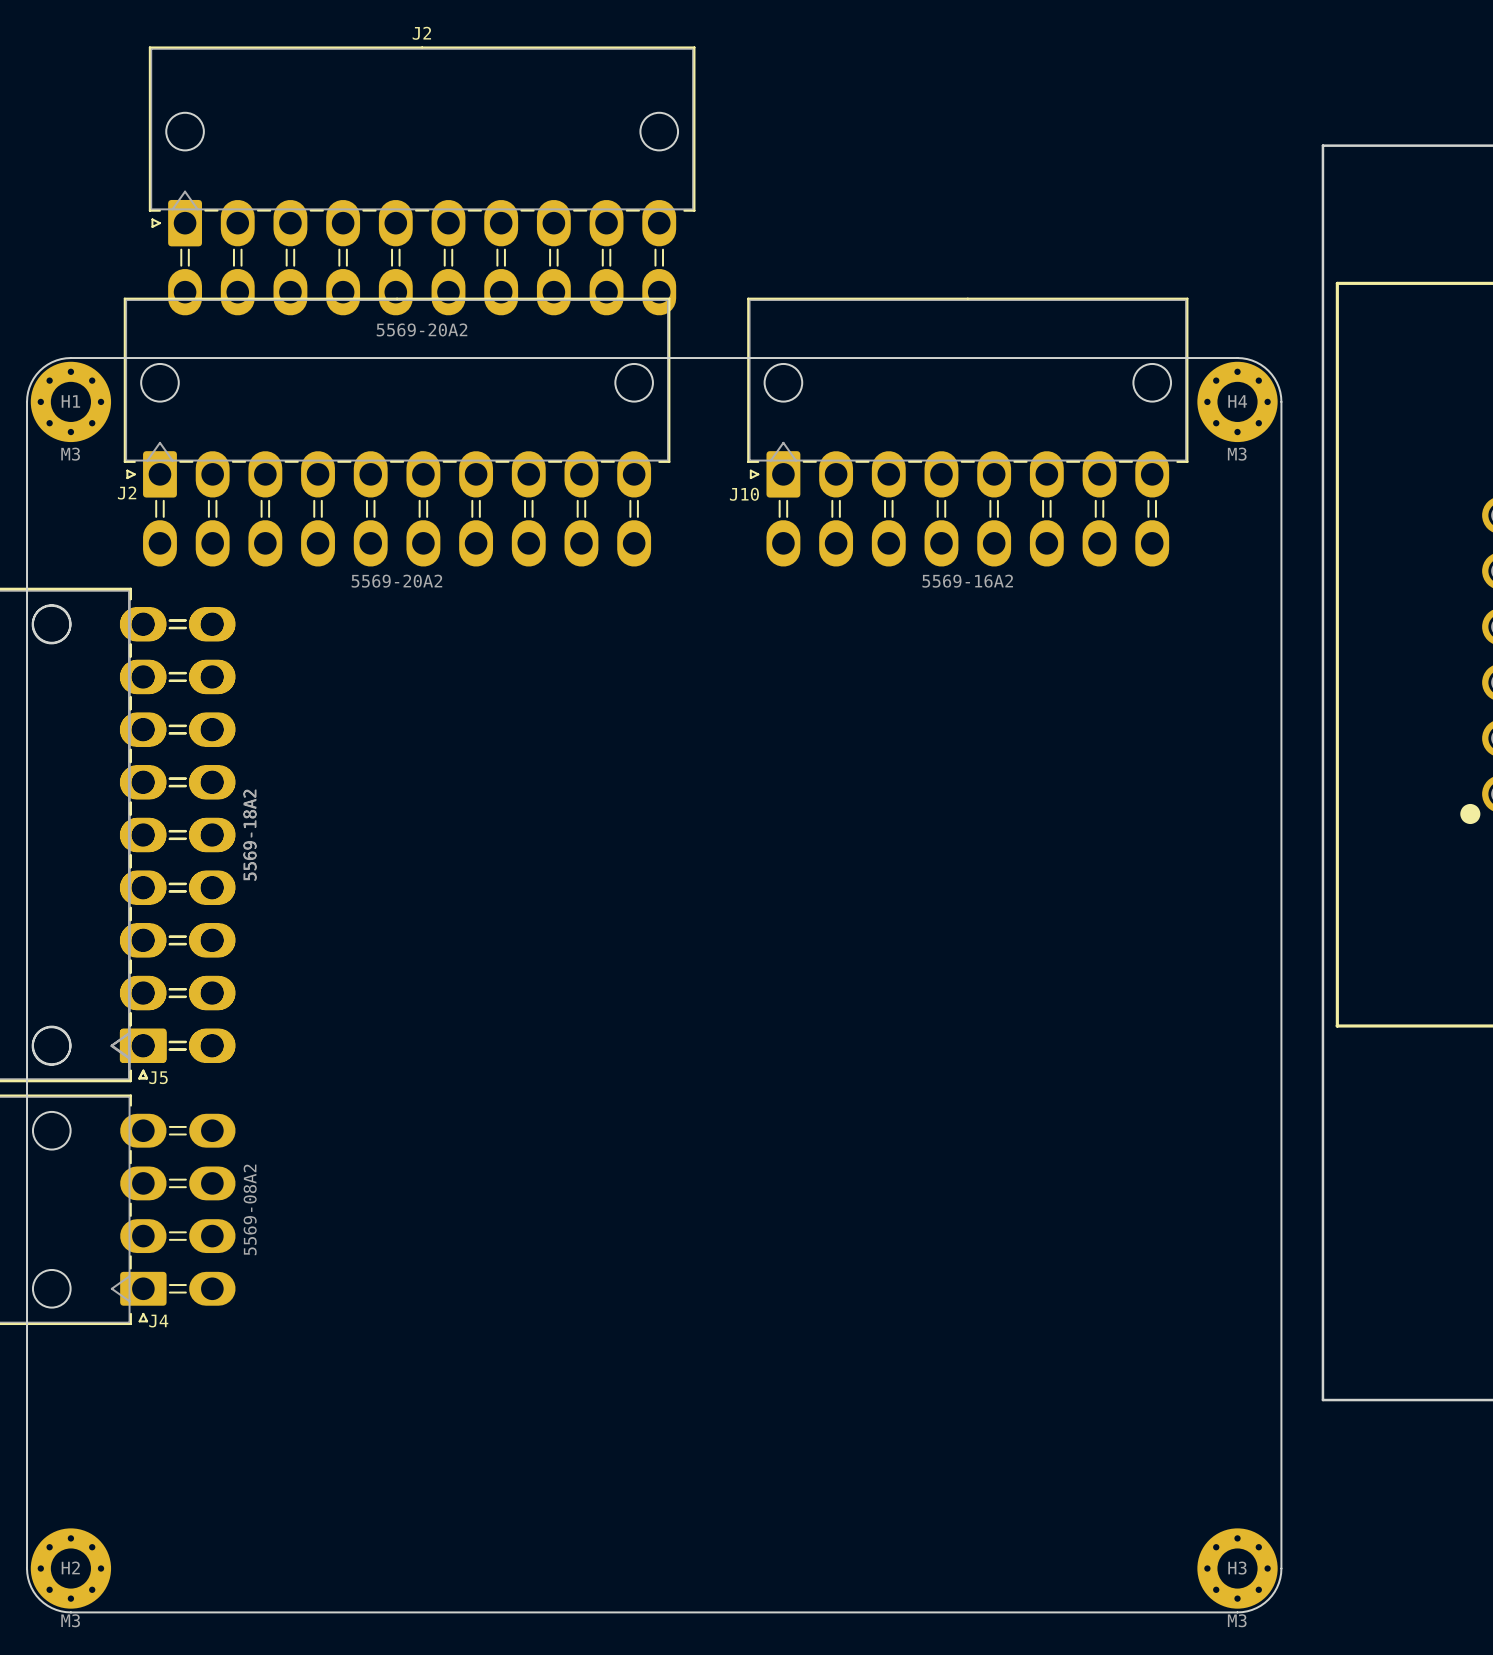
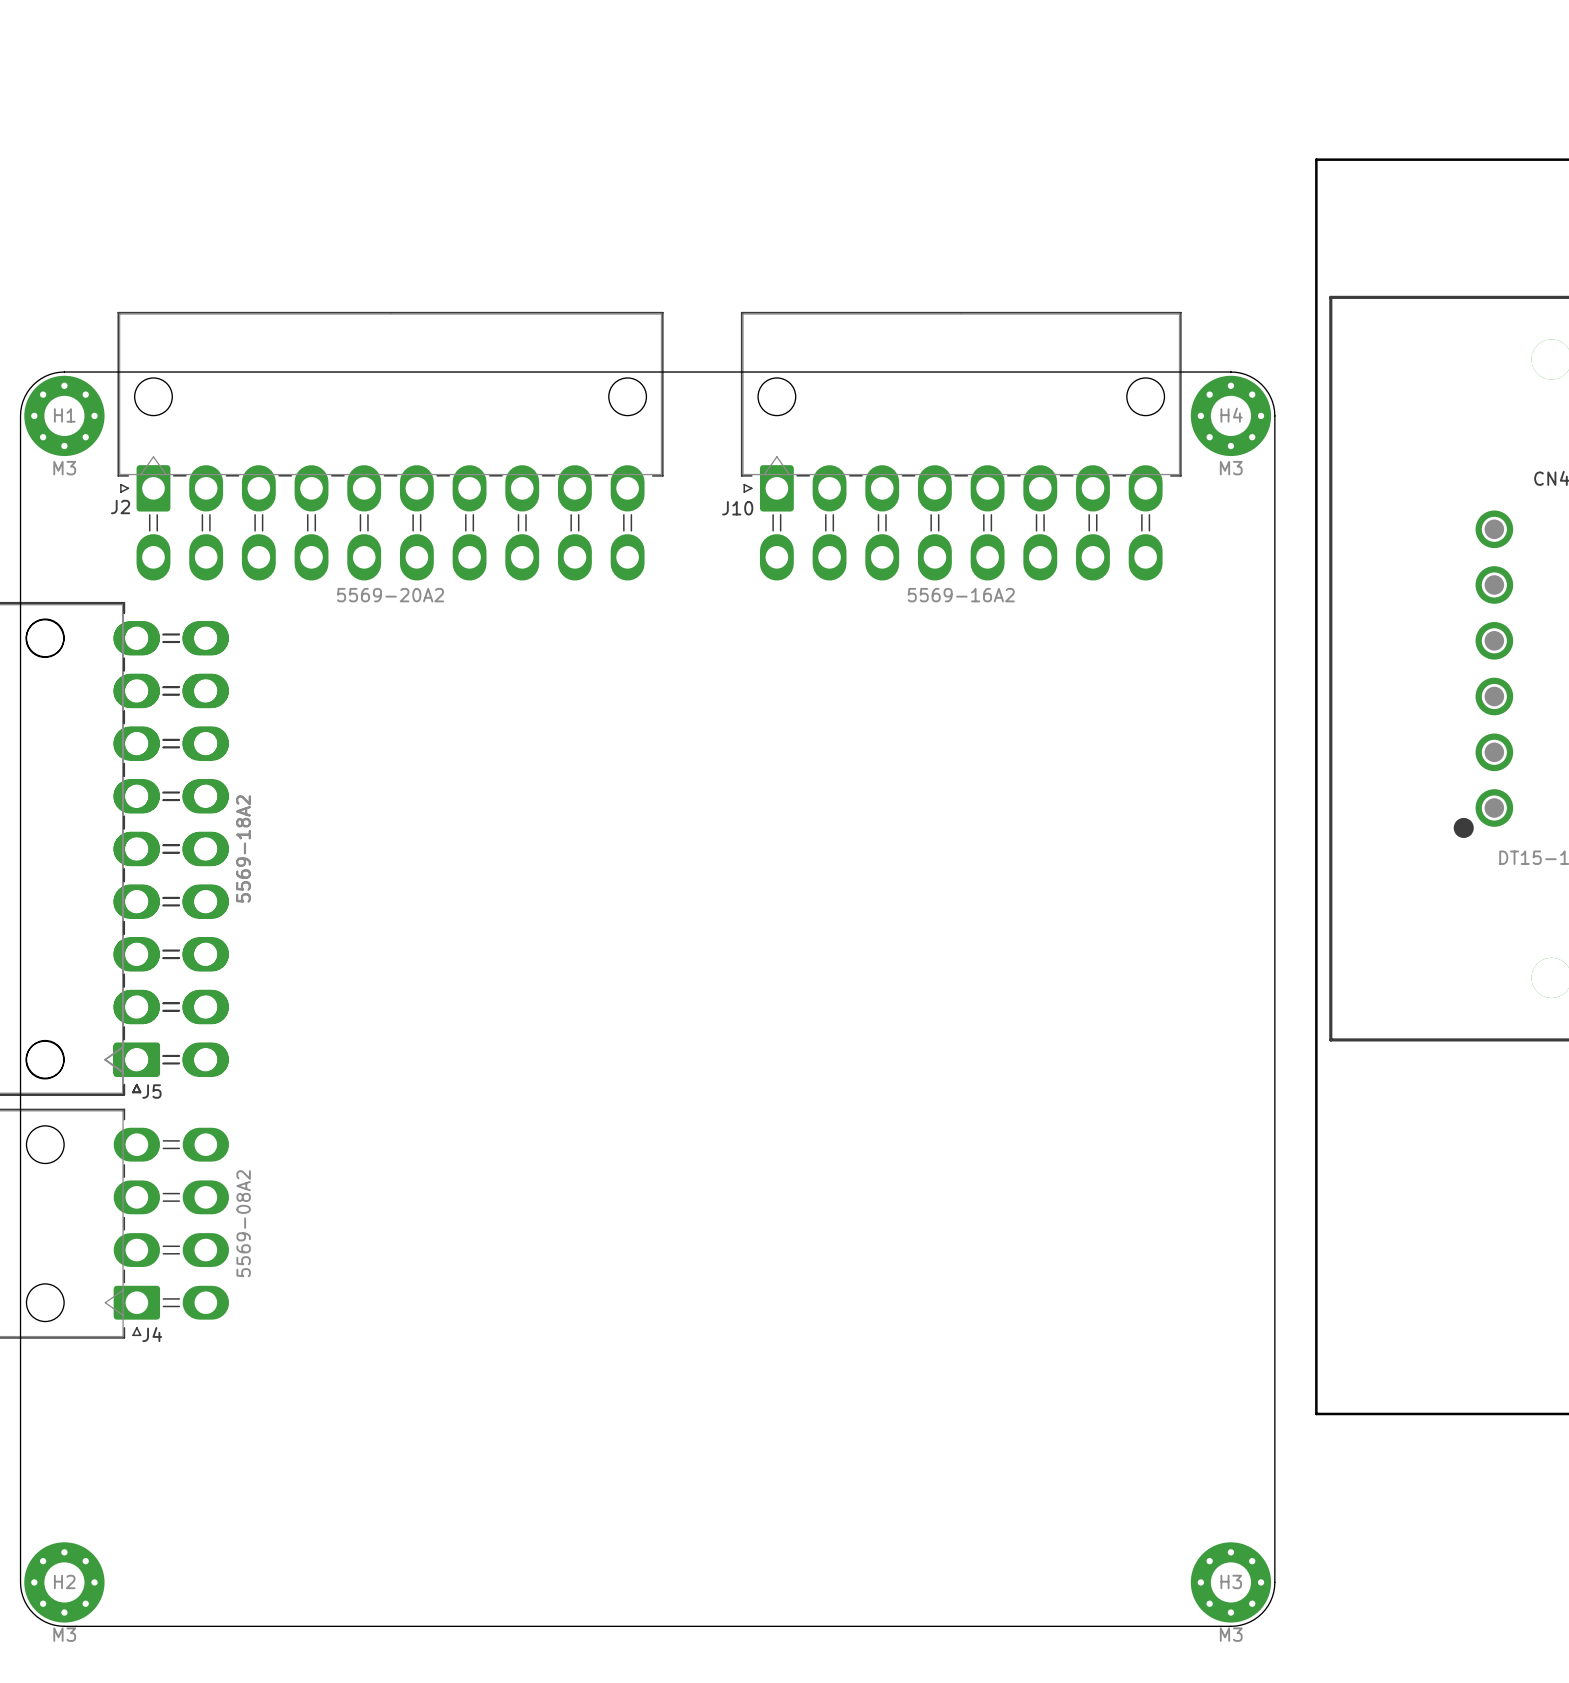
J2: 5569-20A2 (422, 181) -> none

